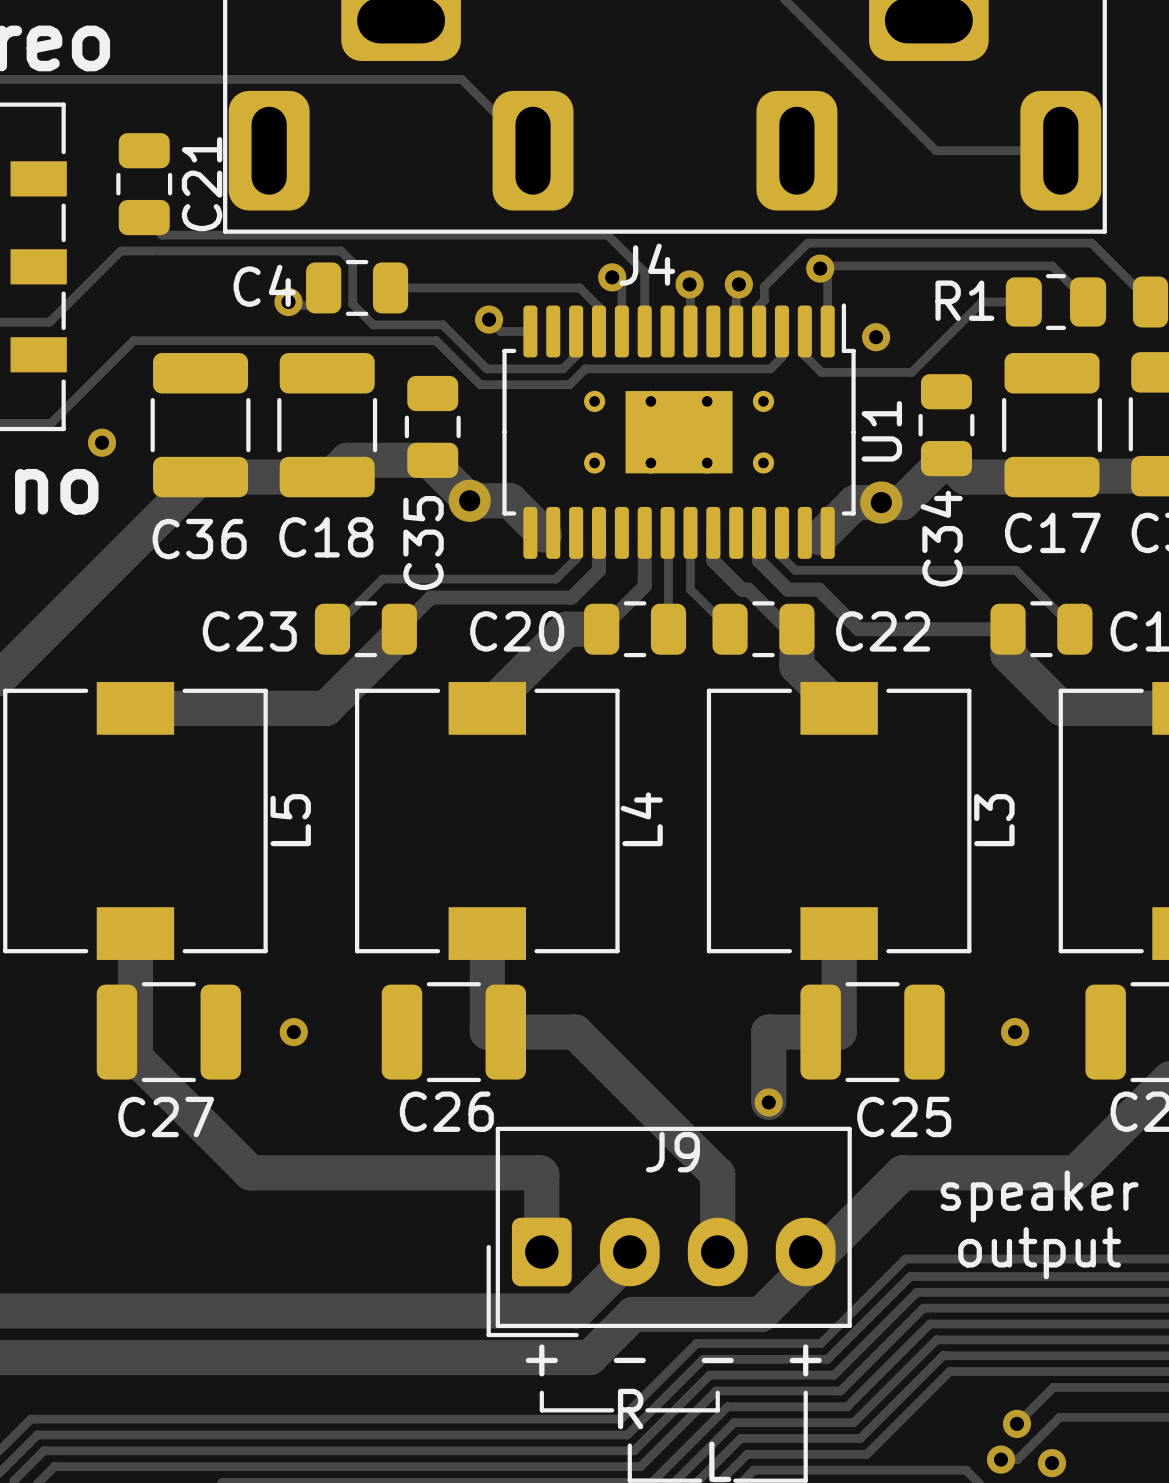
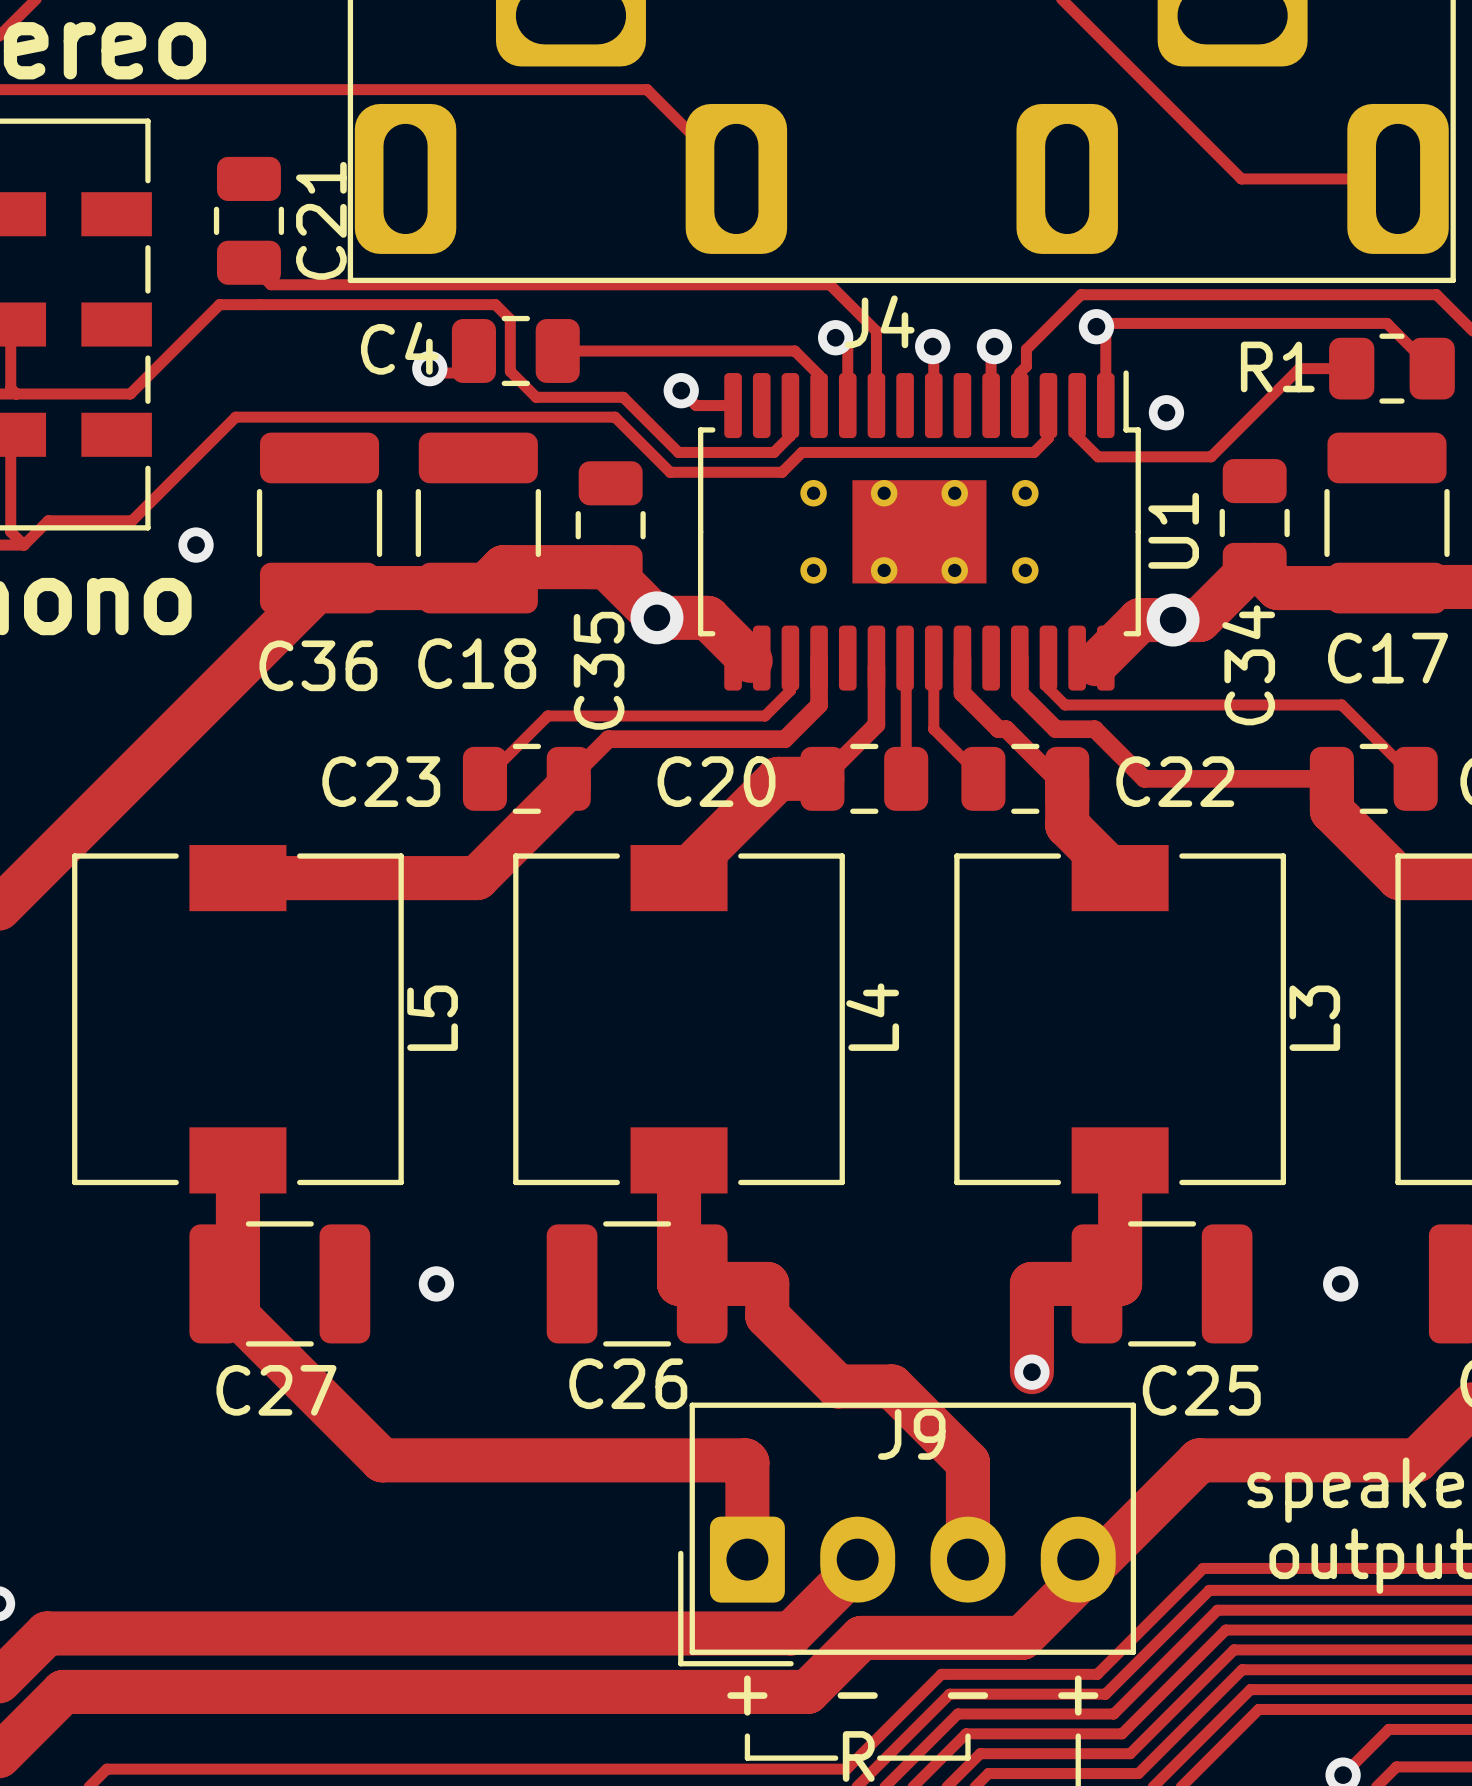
track: (557, 1032) (575, 1032) (657, 1113) -> (767, 1283) (767, 1315) (837, 1386) (891, 1386)

